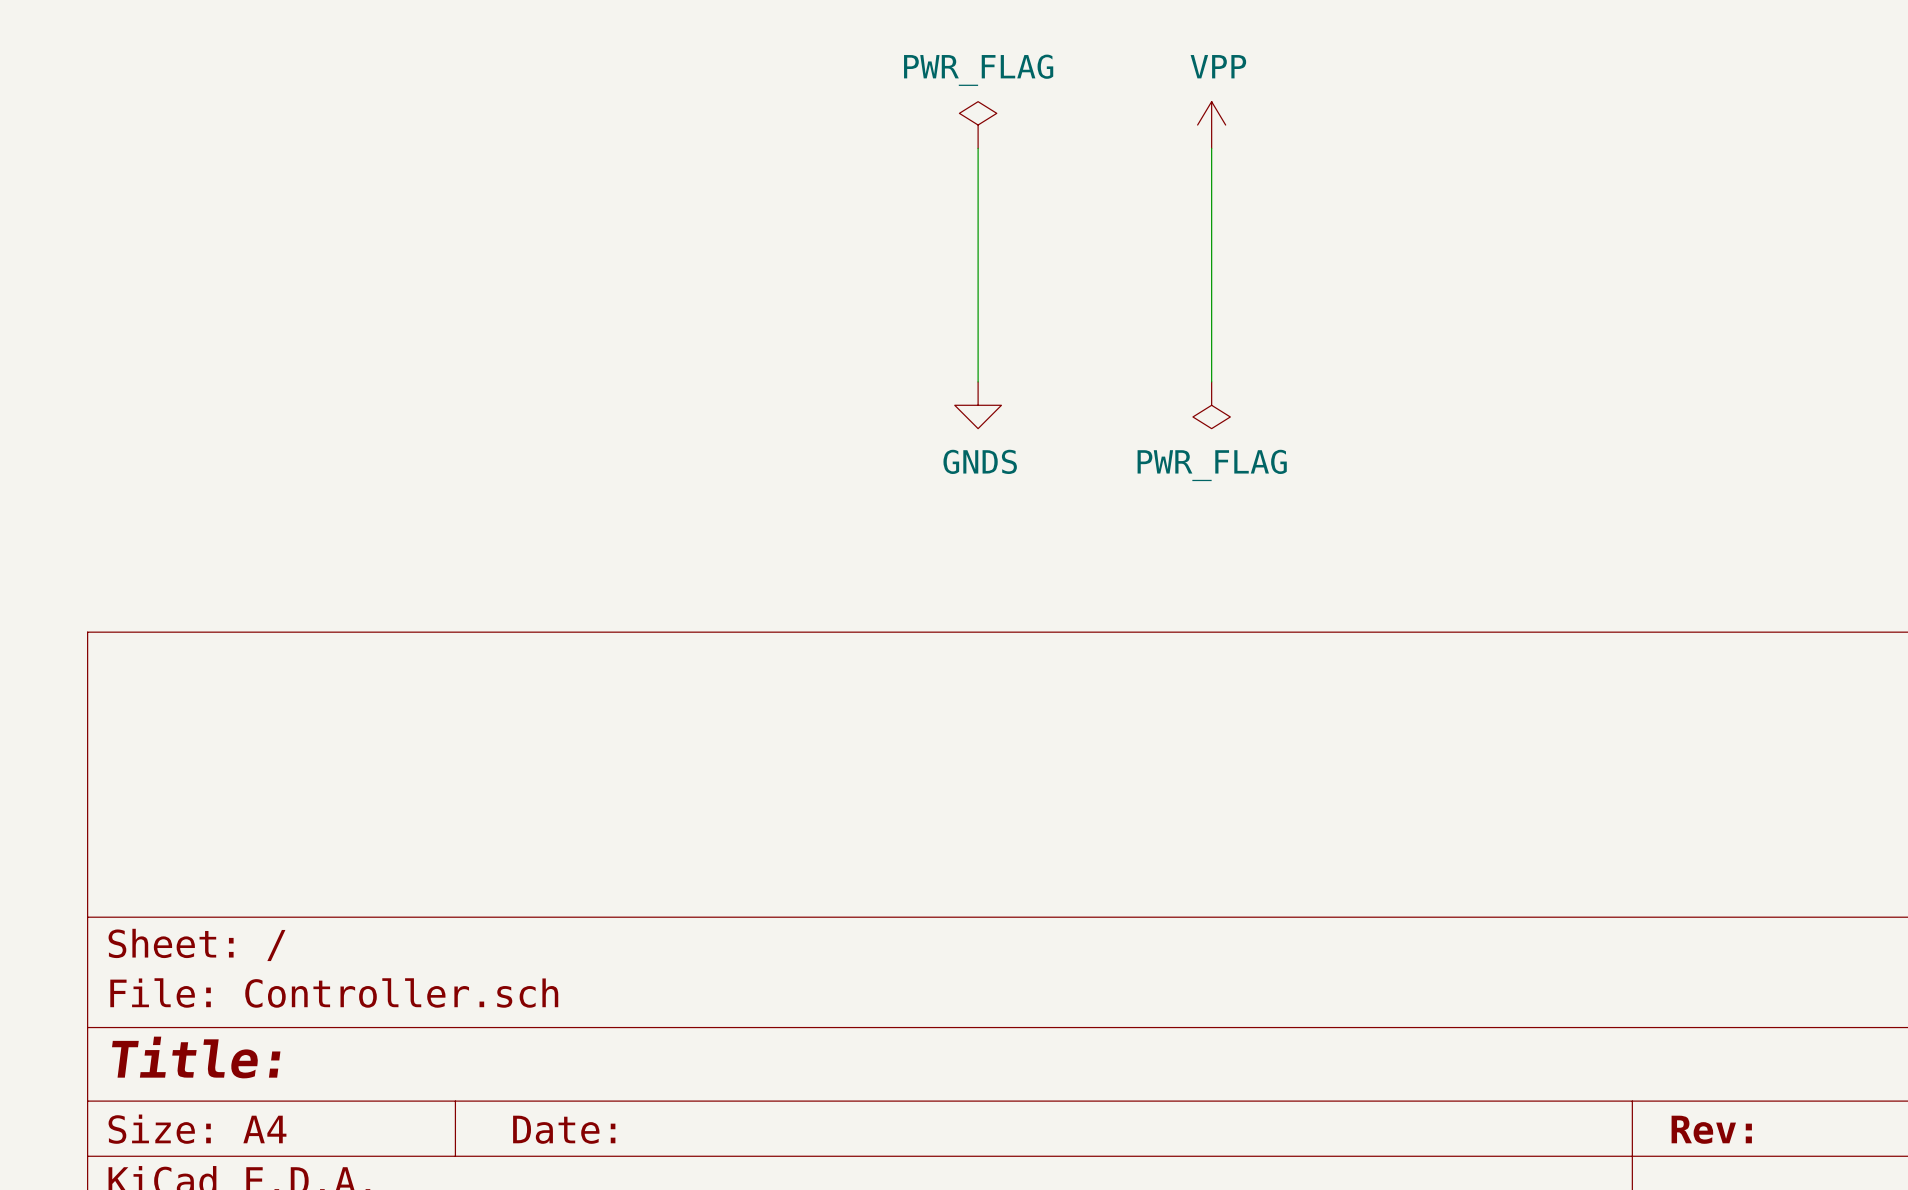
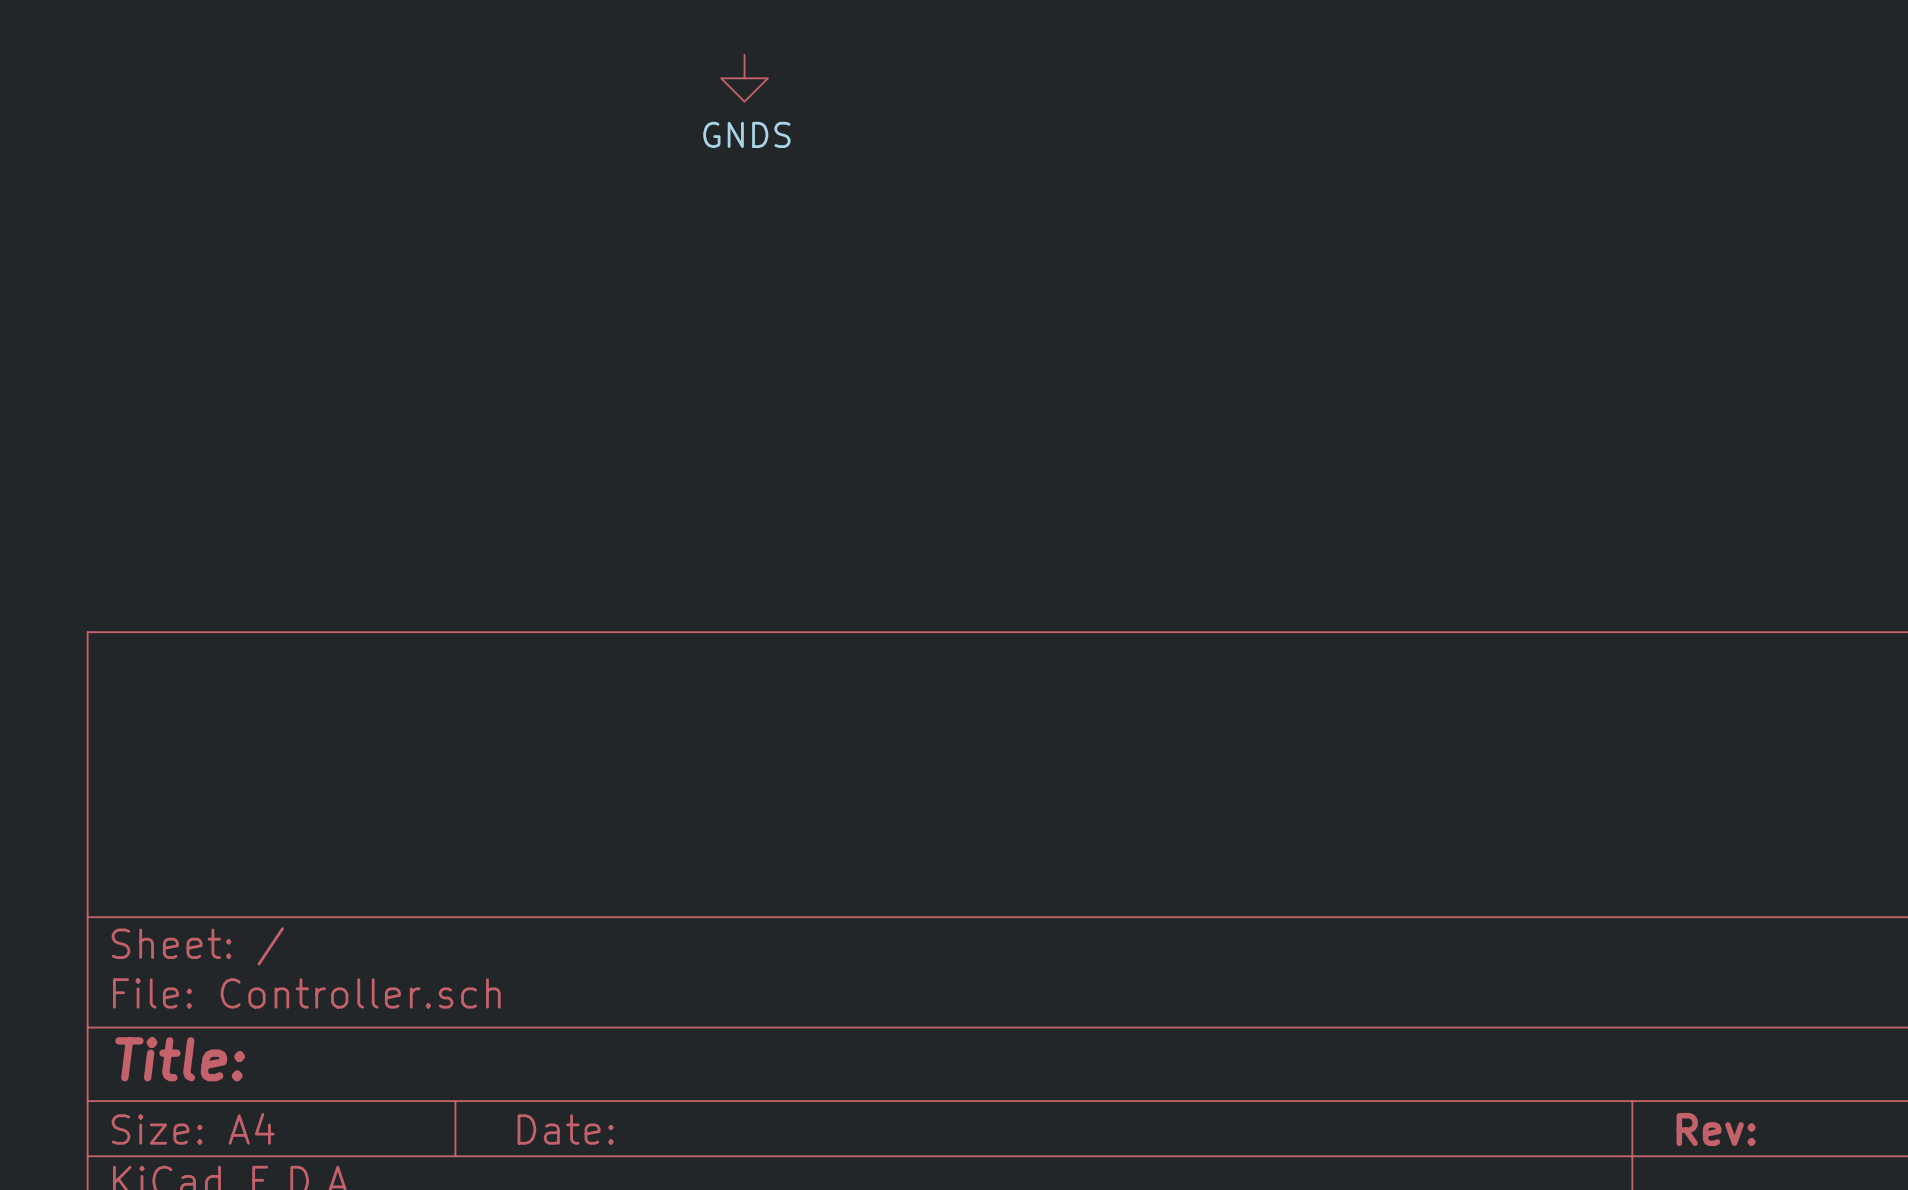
power symbol: PWR_FLAG (978, 125) -> none
power symbol: VPP (1211, 125) -> none
wire: (978, 148) (978, 381) -> none
wire: (1211, 148) (1211, 381) -> none
power symbol position: GNDS (978, 405) -> GNDS (744, 78)
power symbol: PWR_FLAG (1211, 405) -> none

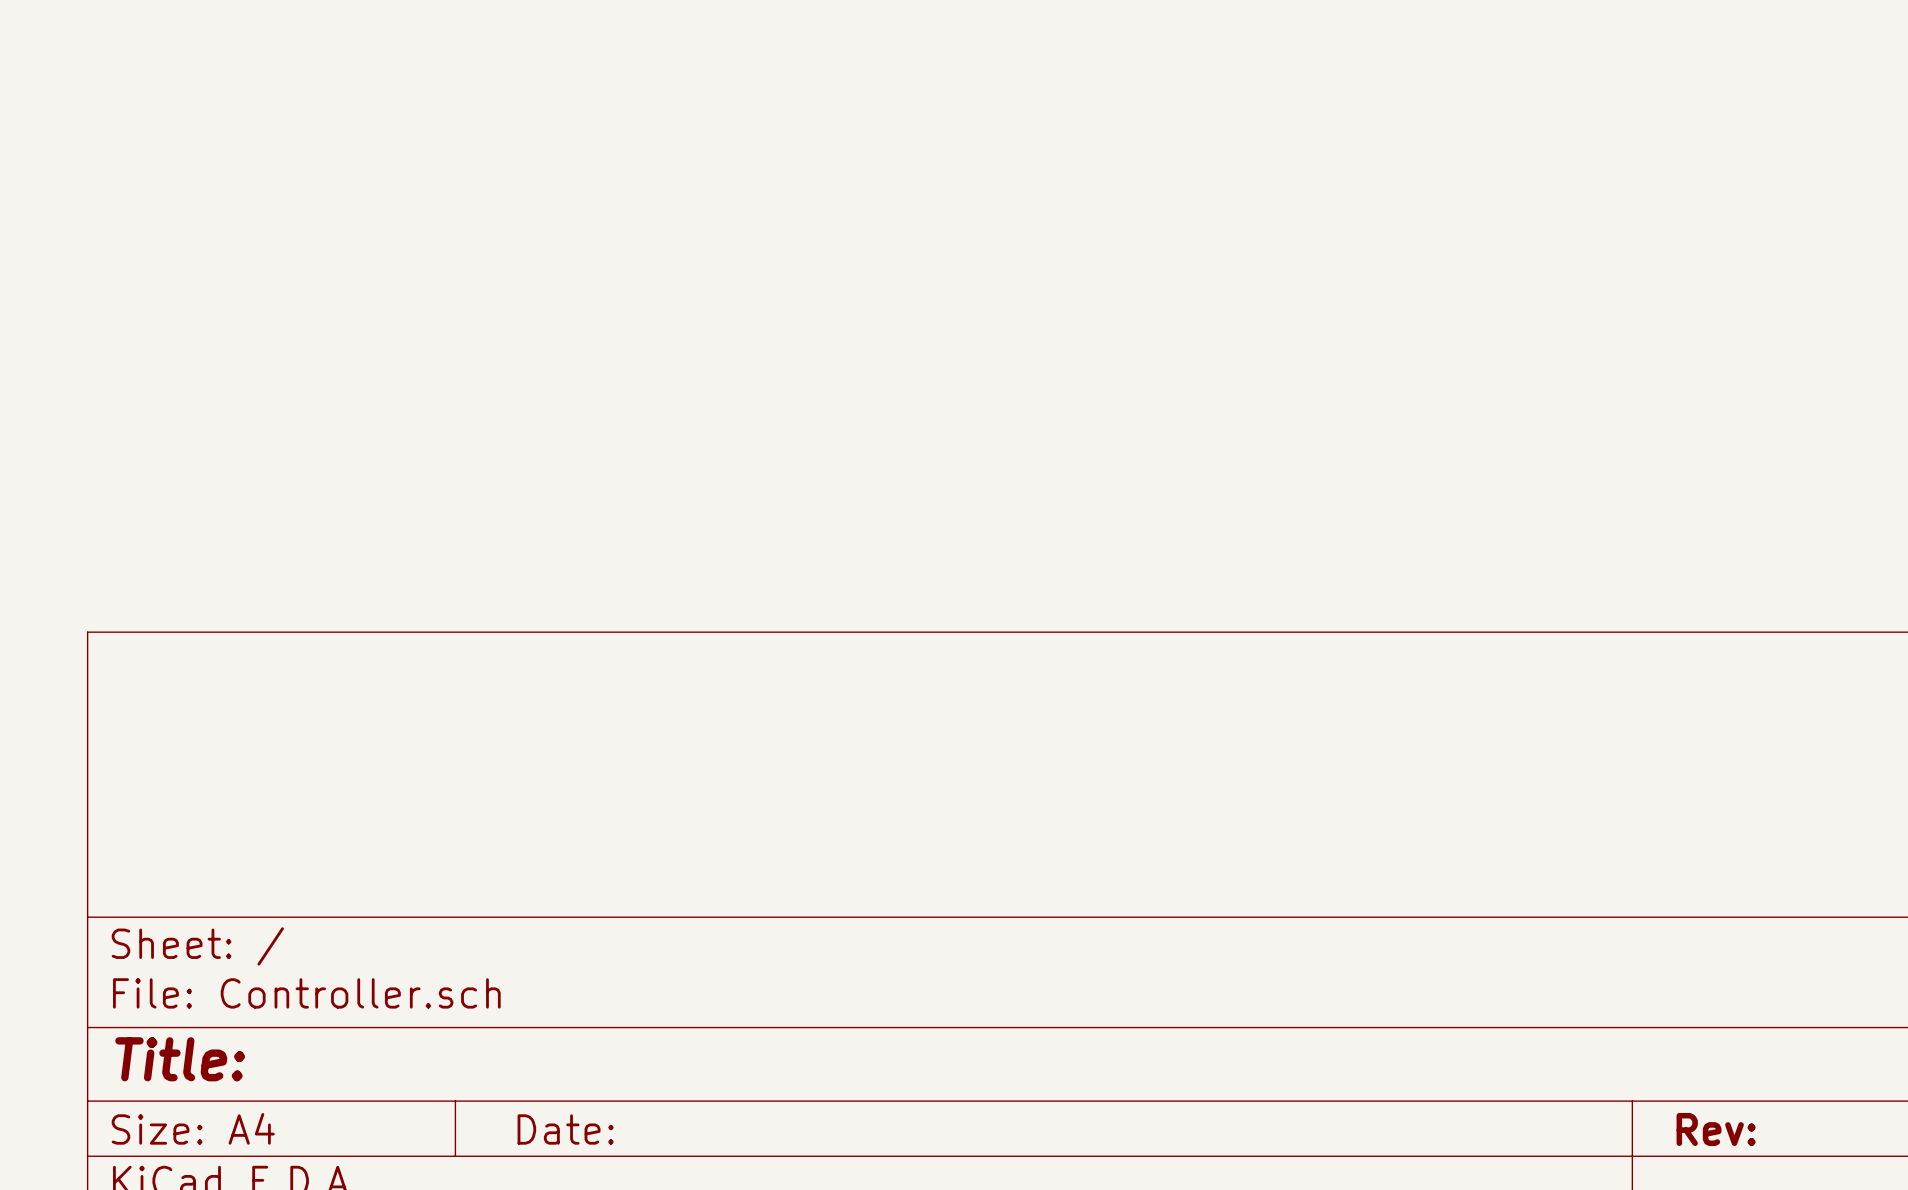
power symbol: GNDS (744, 78) -> none

